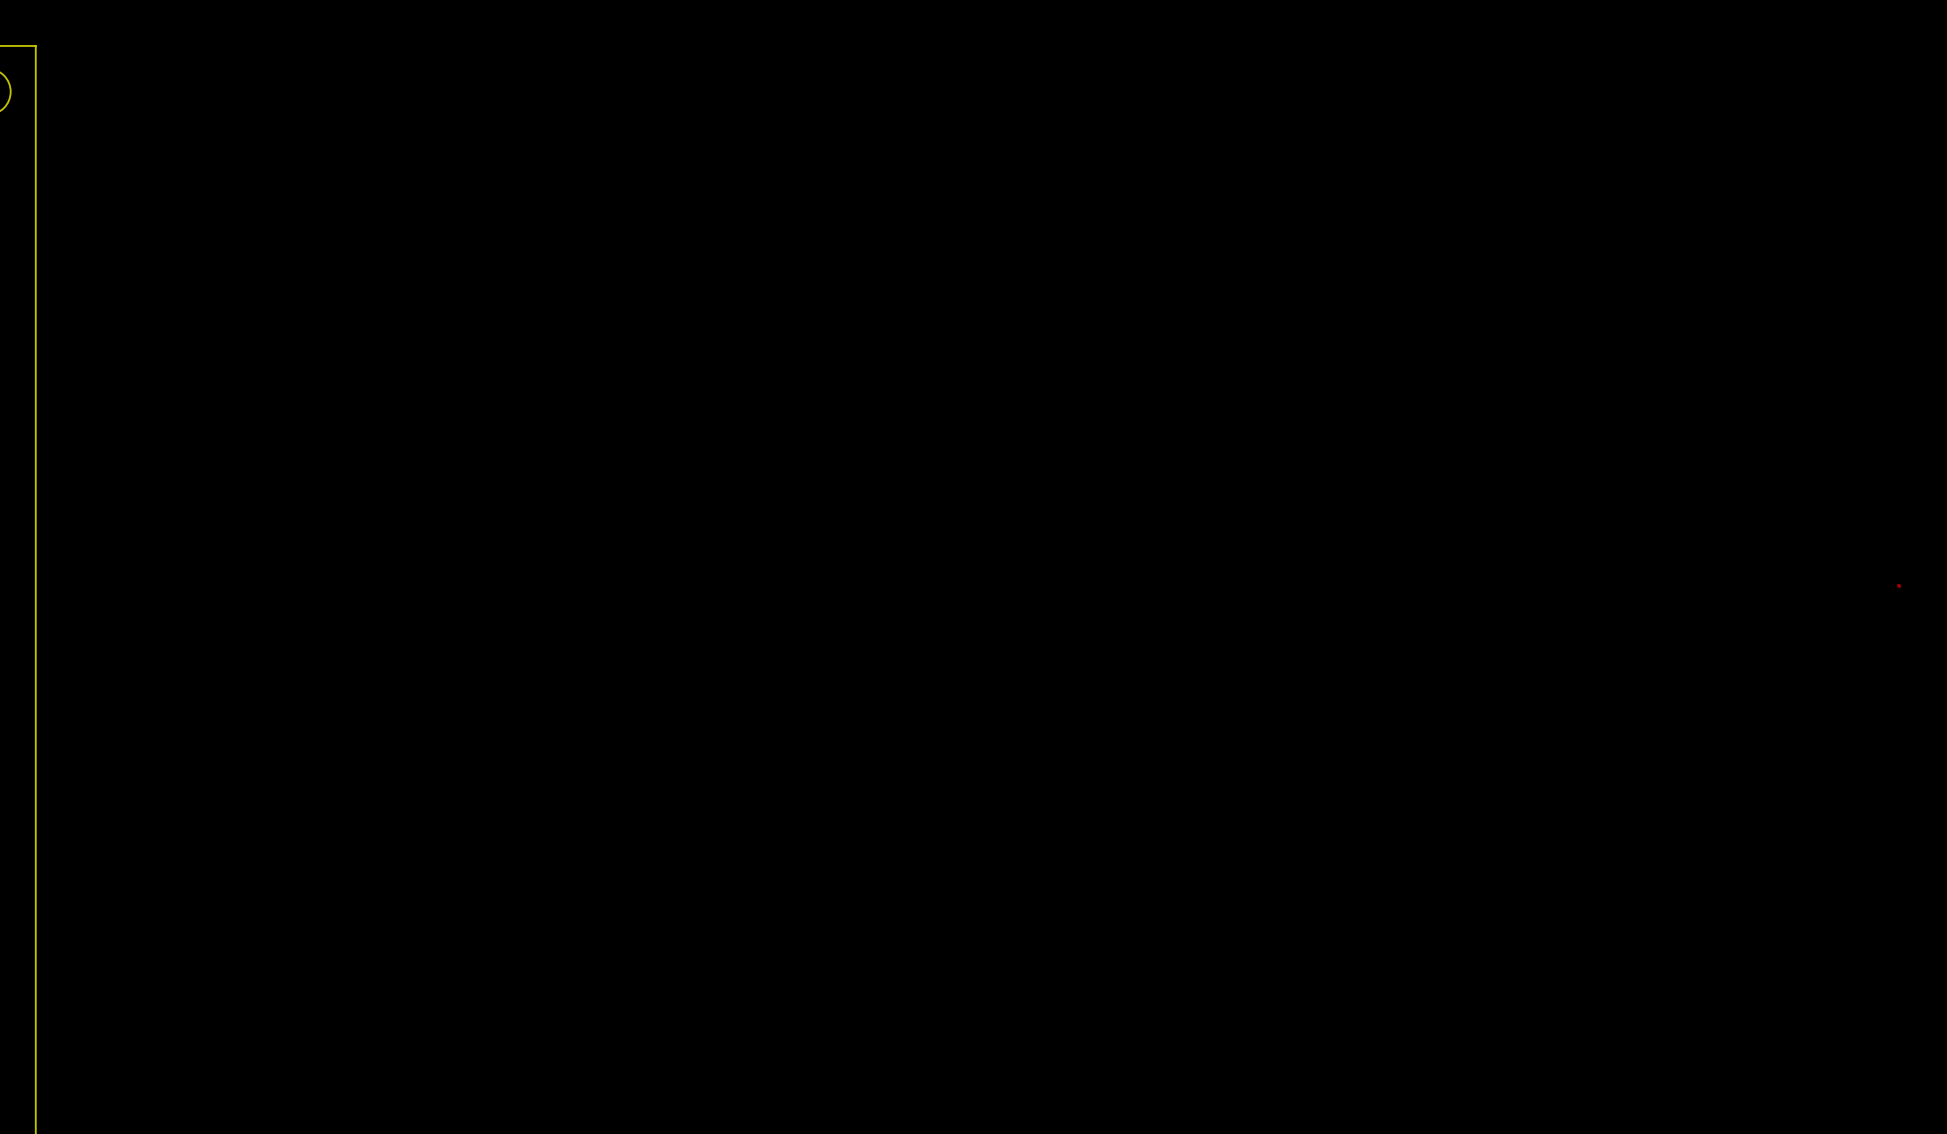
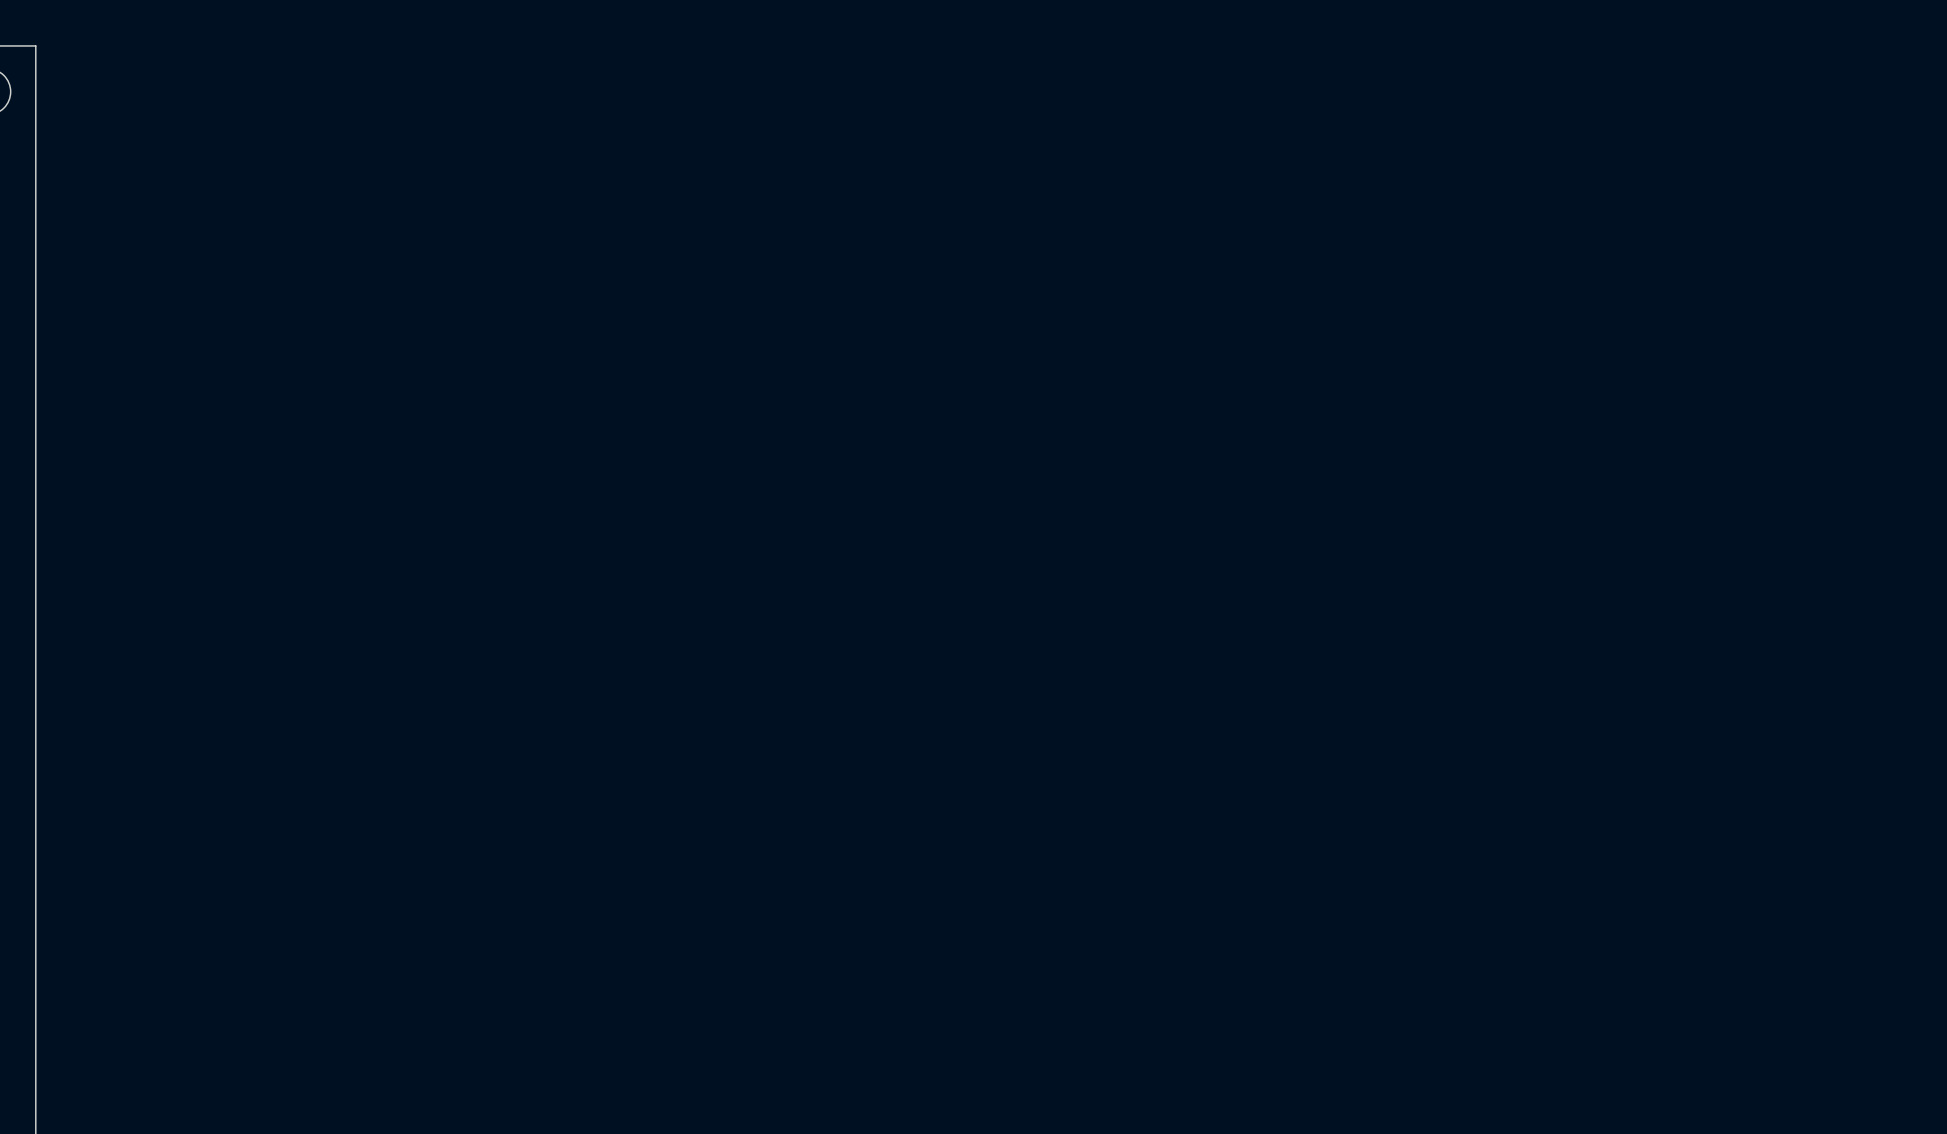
top track: (1898, 585) (1899, 586) -> none

